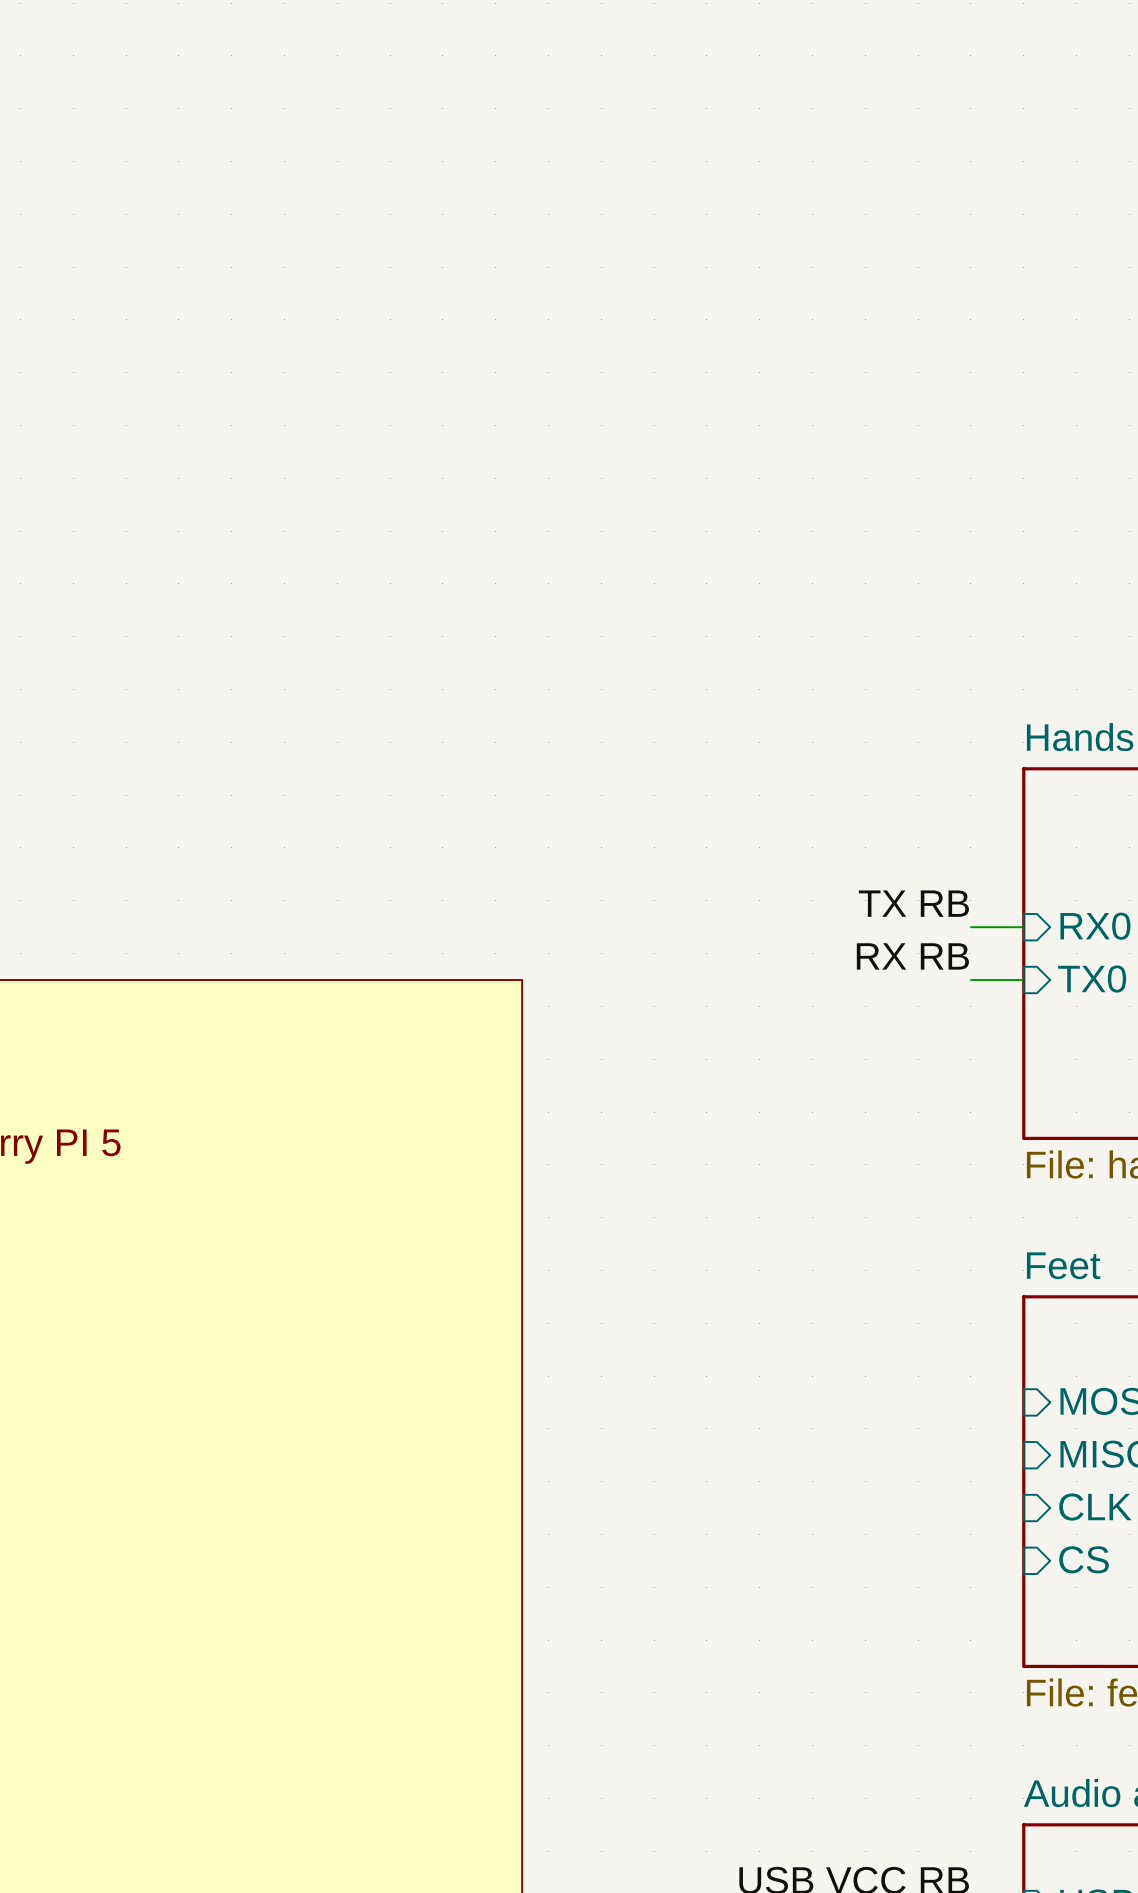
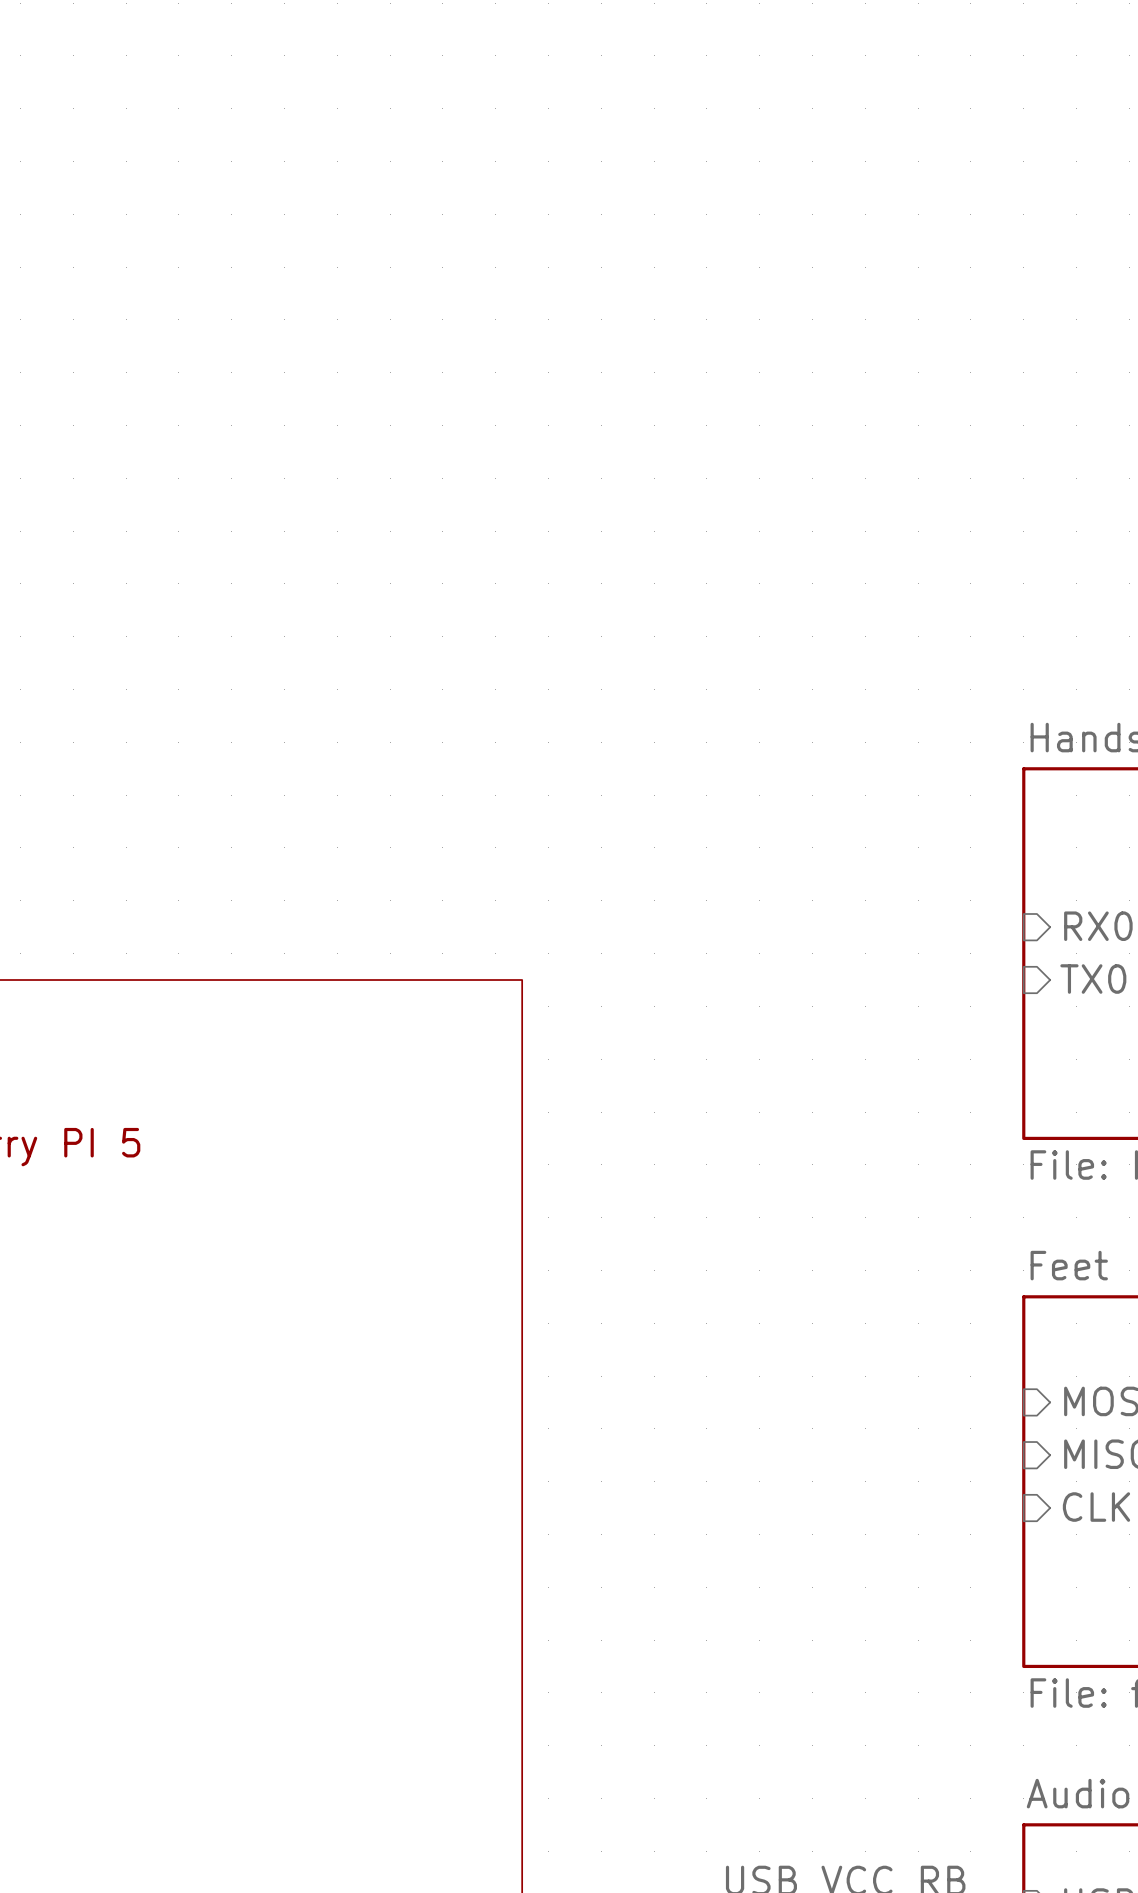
label: TX RB (913, 903) -> none
wire: (970, 927) (1023, 927) -> none
label: RX RB (912, 956) -> none
wire: (970, 980) (1023, 980) -> none
sheet pin: CS (1084, 1559) -> none

